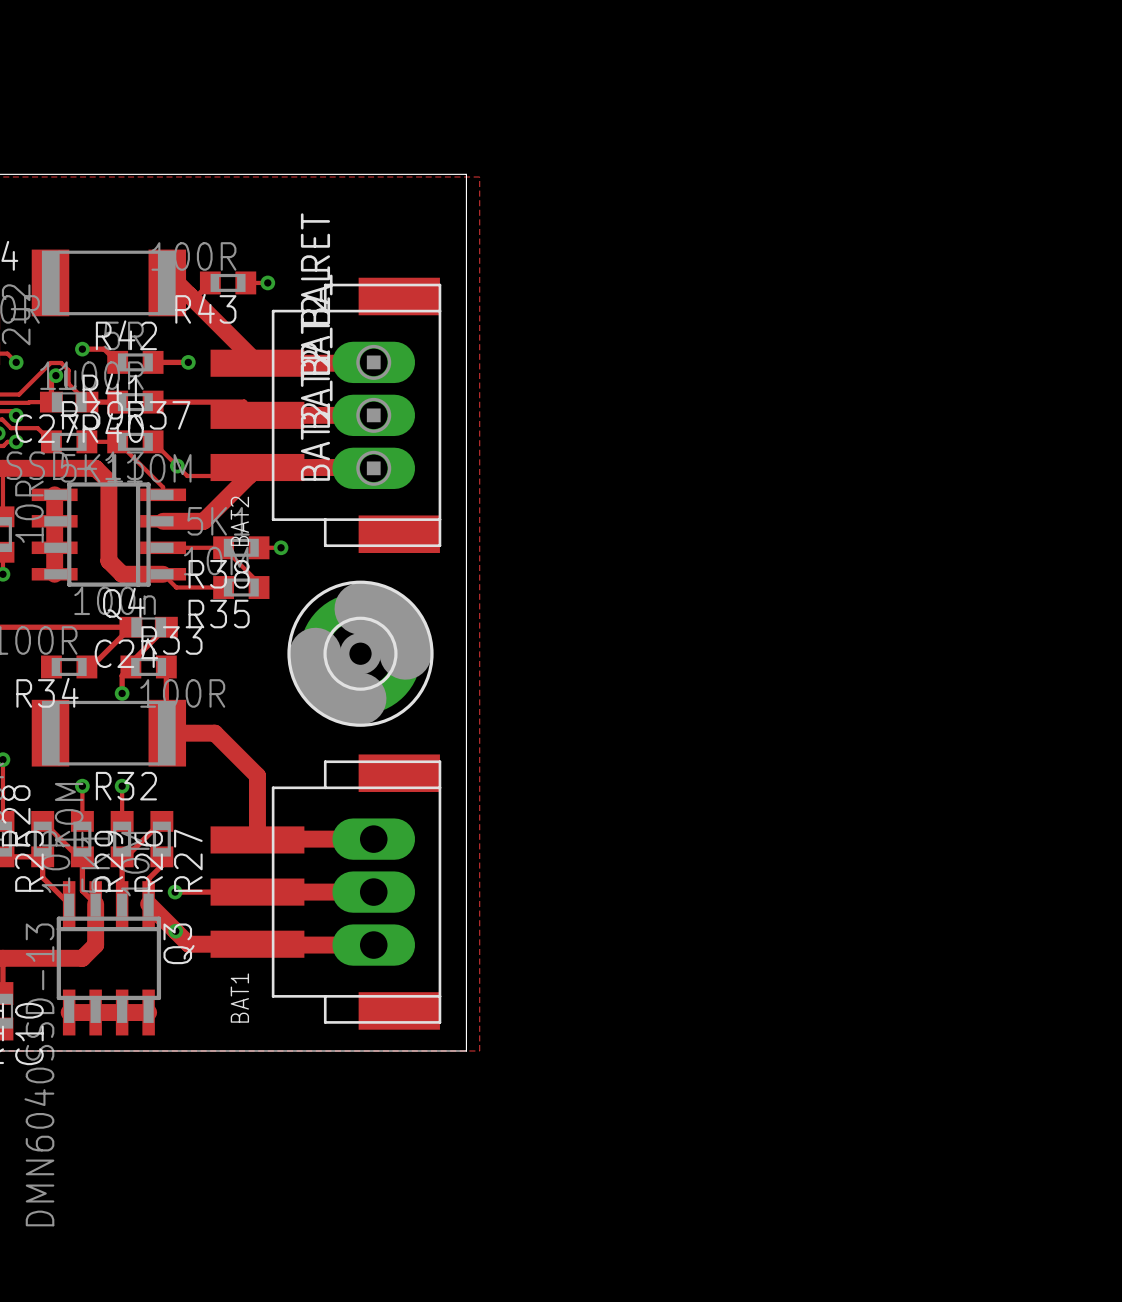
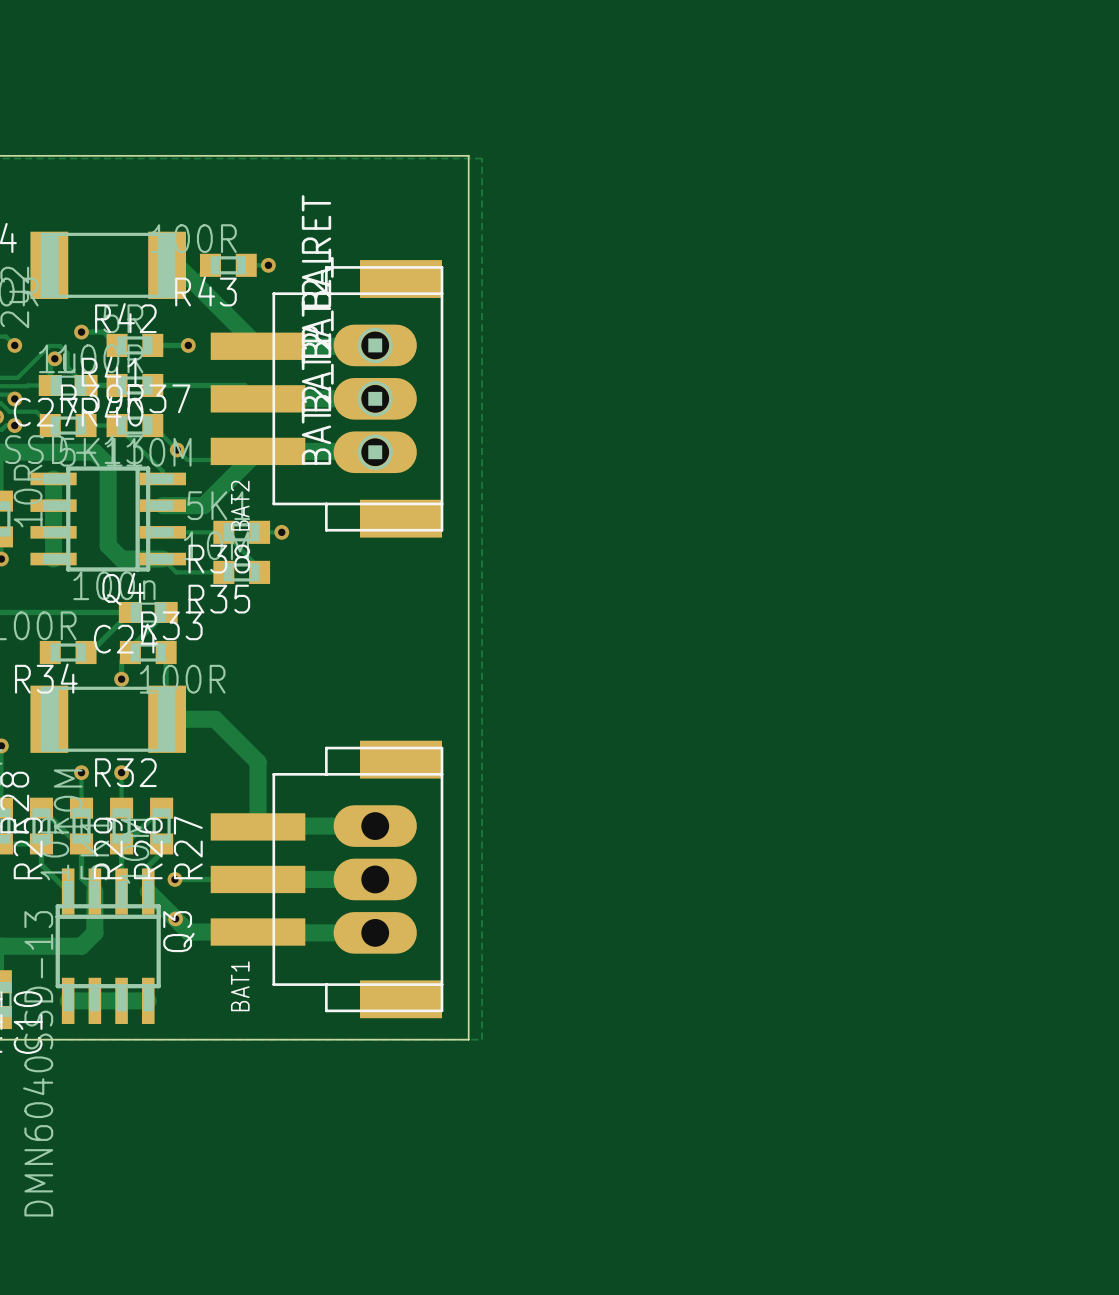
part: (360, 653) -> none

